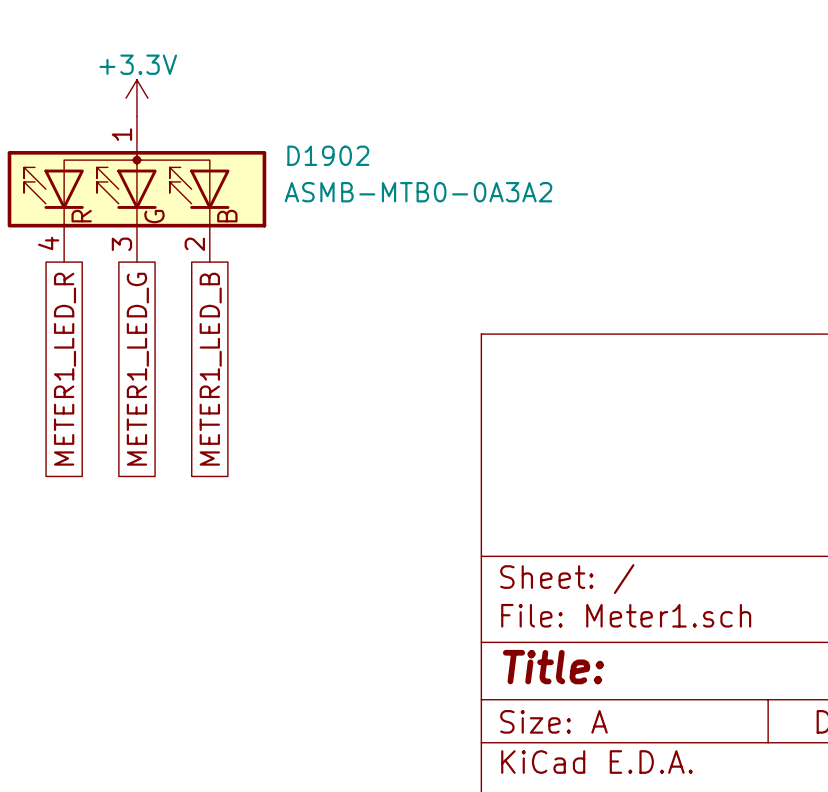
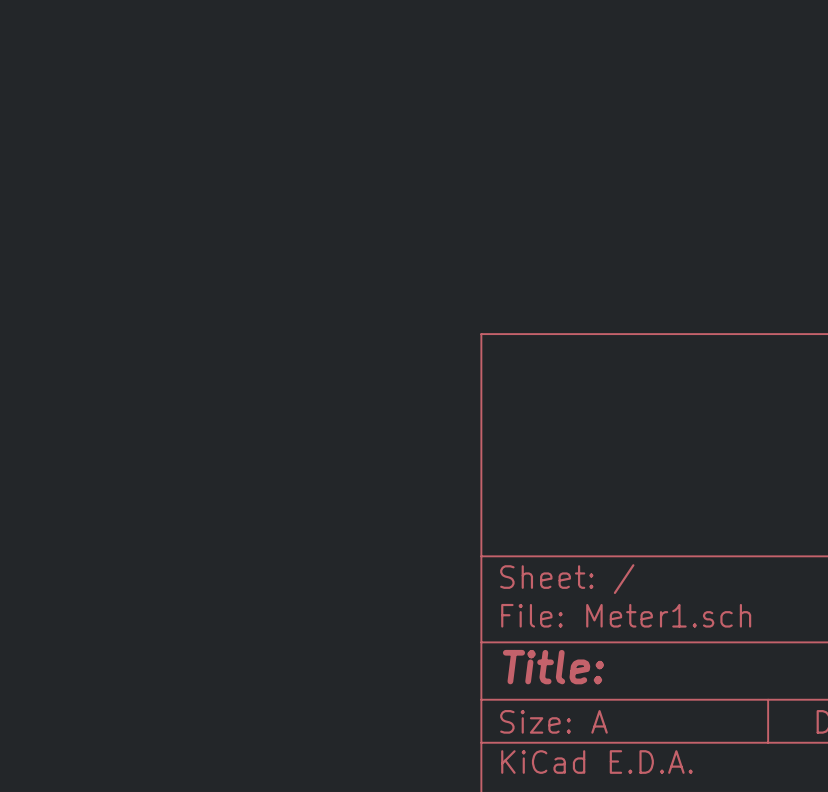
power symbol: +3.3V (136, 98) -> none
D1902: ASMB-MTB0-0A3A2 (136, 189) -> none
global label: METER1_LED_R (64, 369) -> none
global label: METER1_LED_G (137, 369) -> none
global label: METER1_LED_B (210, 369) -> none

